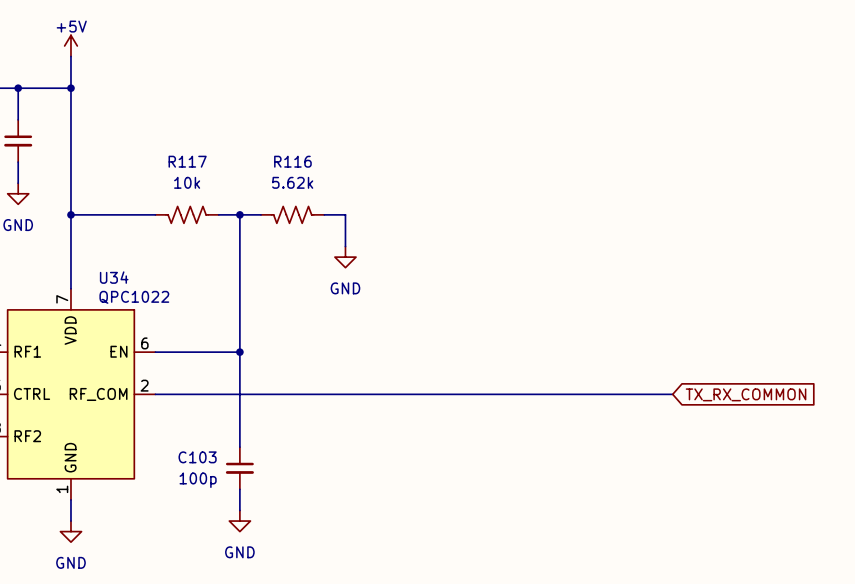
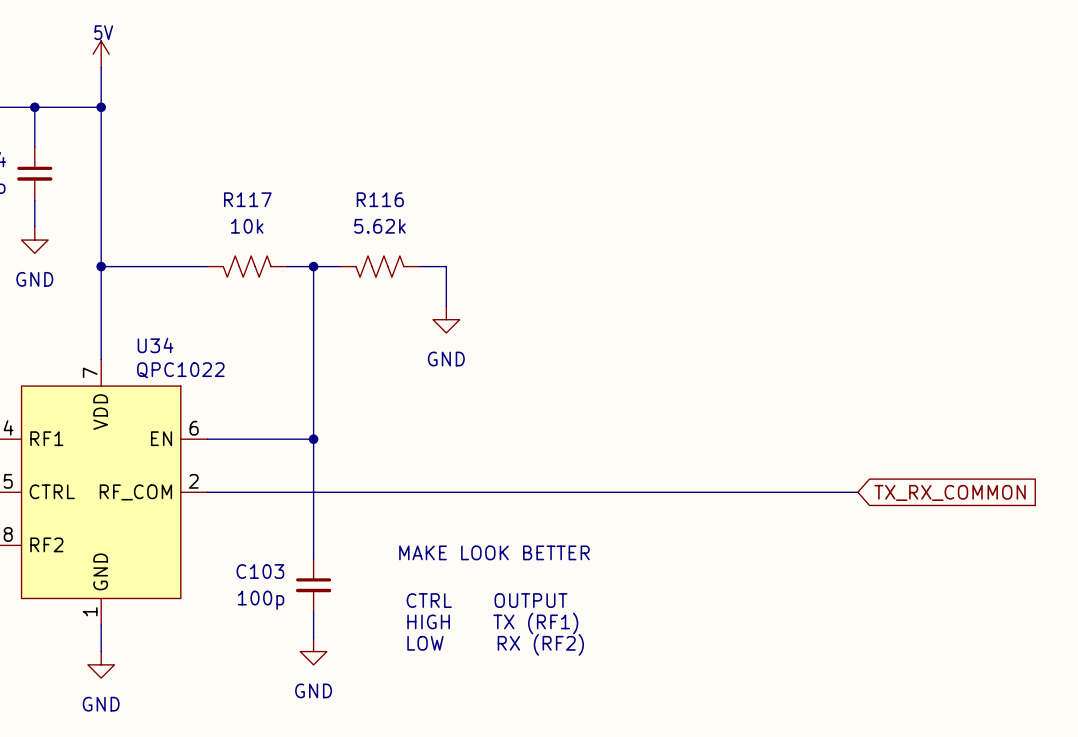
power symbol: +5V (70, 45) -> 5V (101, 54)
text: none -> MAKE LOOK BETTER (494, 552)
text: none -> CTRL OUTPUT (487, 600)
text: none -> HIGH TX (RF1) (492, 623)
text: none -> LOW RX (RF2) (495, 644)

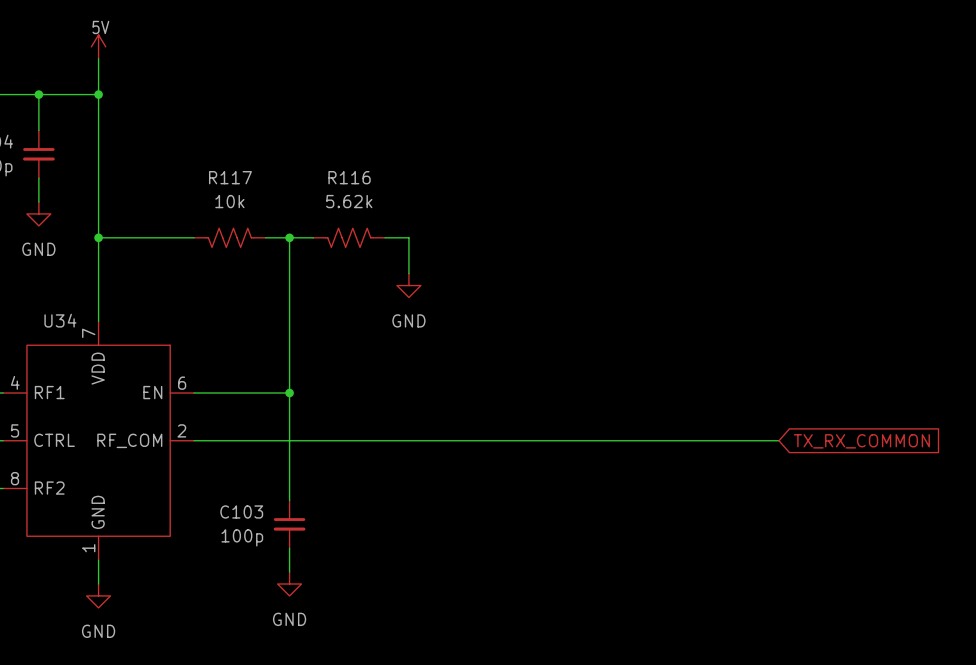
U34 name position: U34 (155, 345) -> U34 (60, 320)
U34 value: QPC1022 (180, 370) -> none
text: MAKE LOOK BETTER (494, 552) -> none
text: CTRL OUTPUT (487, 600) -> none
text: HIGH TX (RF1) (492, 623) -> none
text: LOW RX (RF2) (495, 644) -> none

